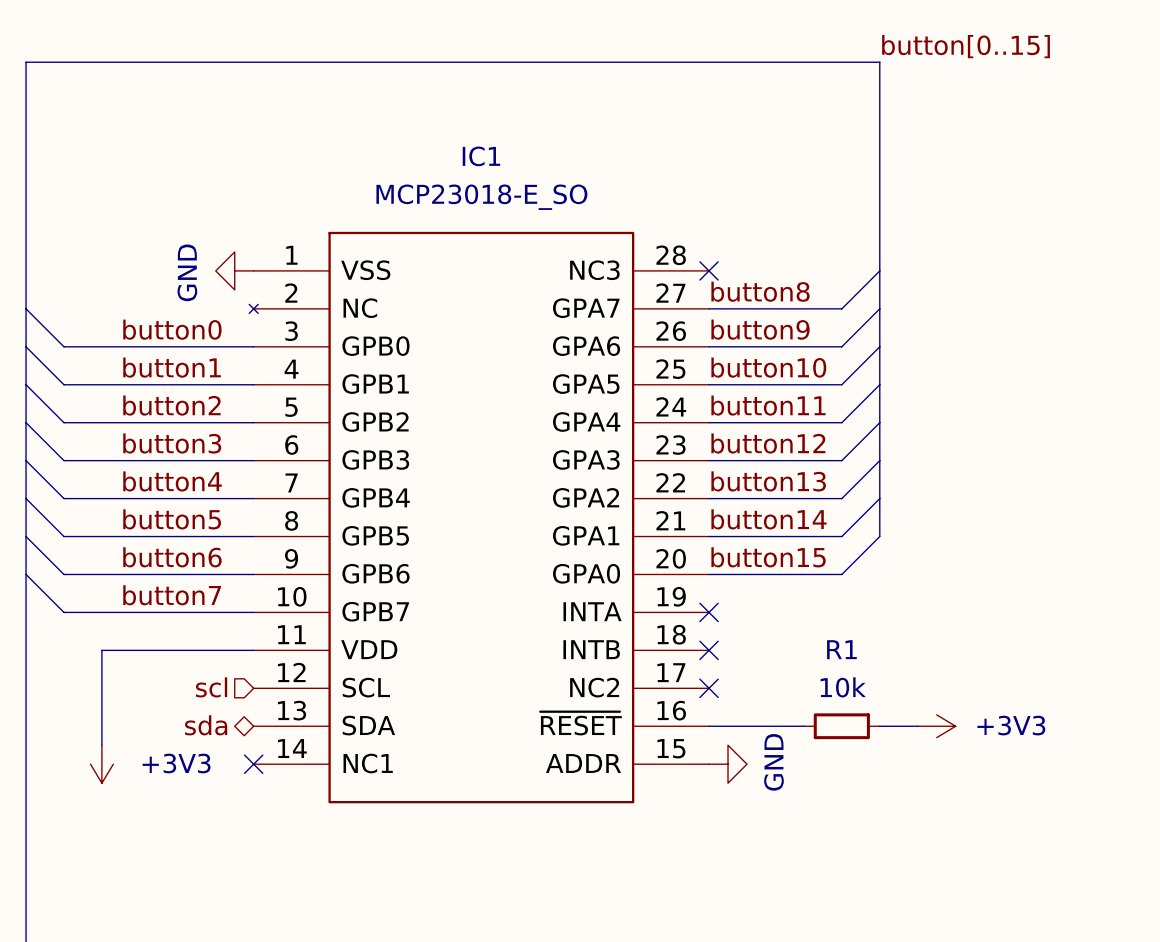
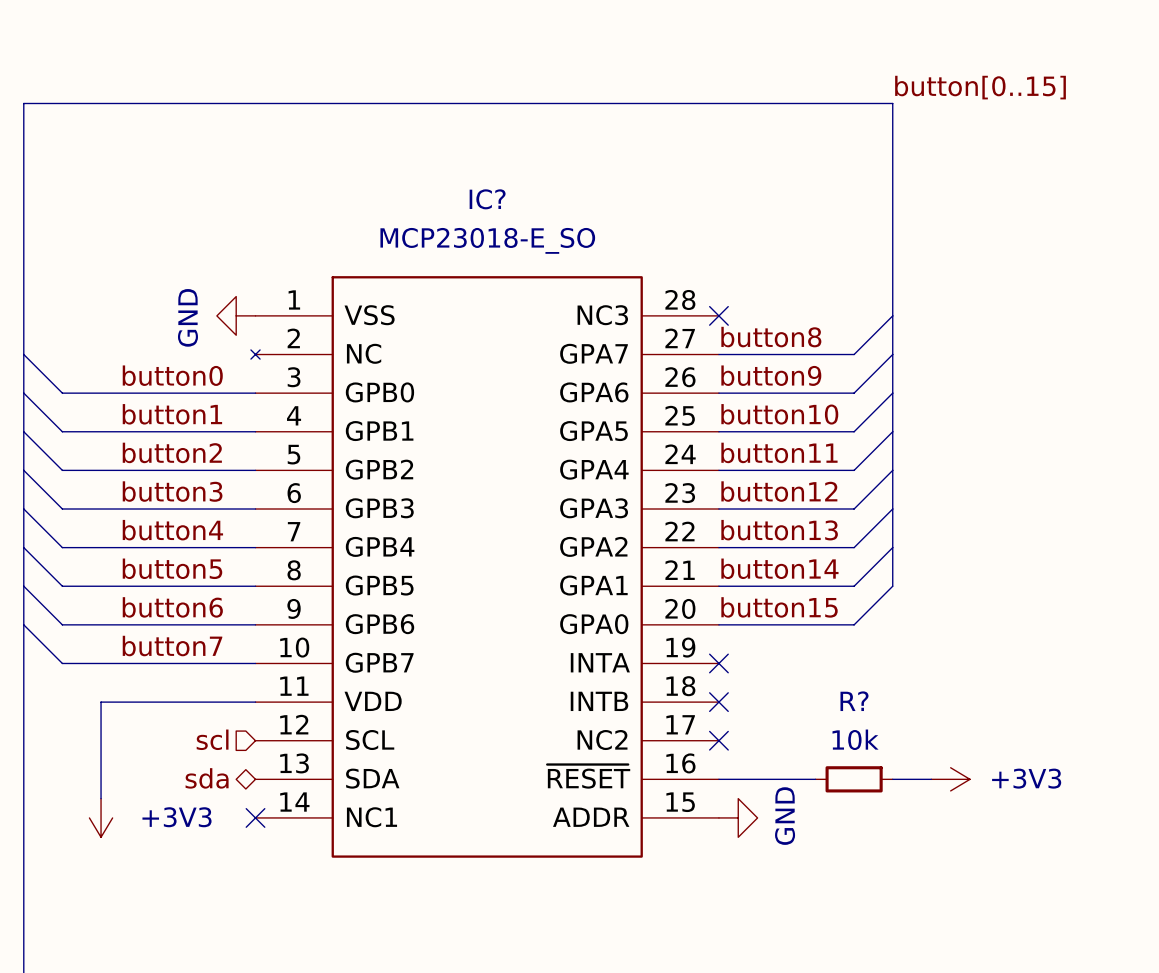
IC1 name: IC1 (481, 156) -> IC? (487, 199)
R1 name: R1 (841, 649) -> R? (854, 701)

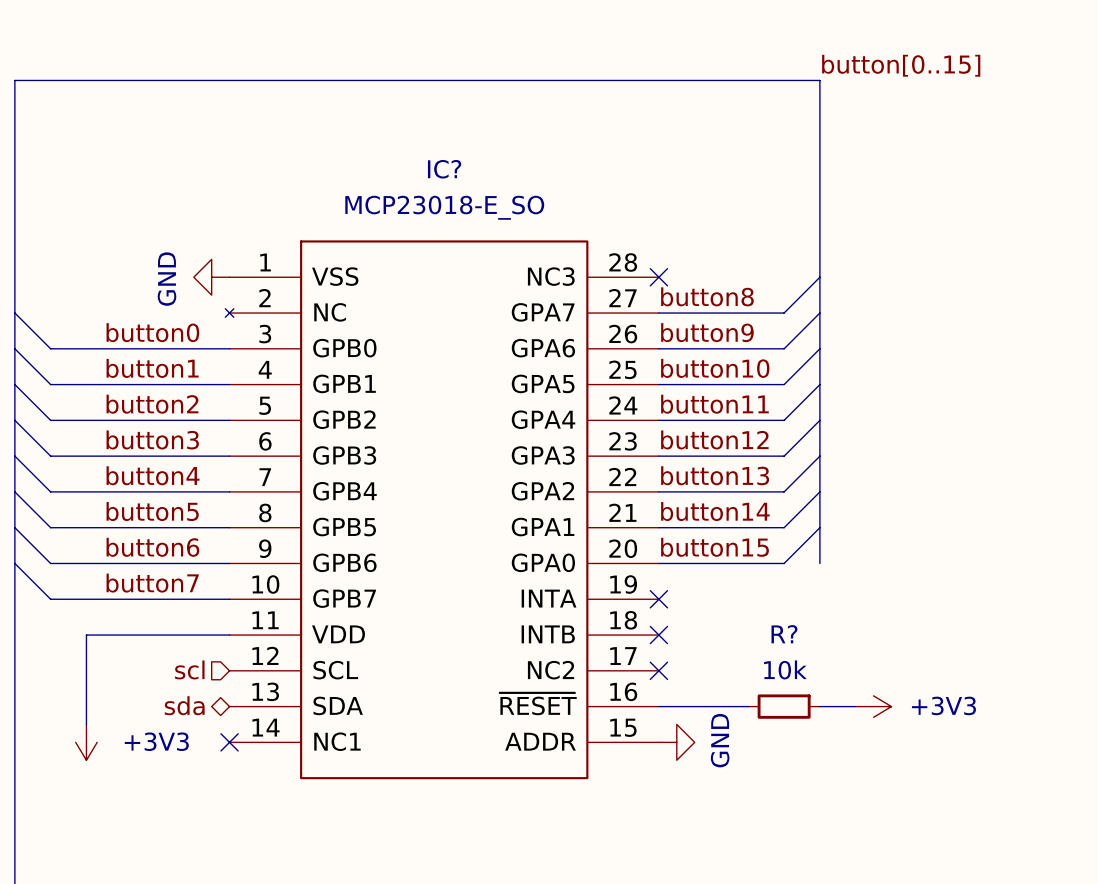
bus: none -> (819, 527) (819, 563)

